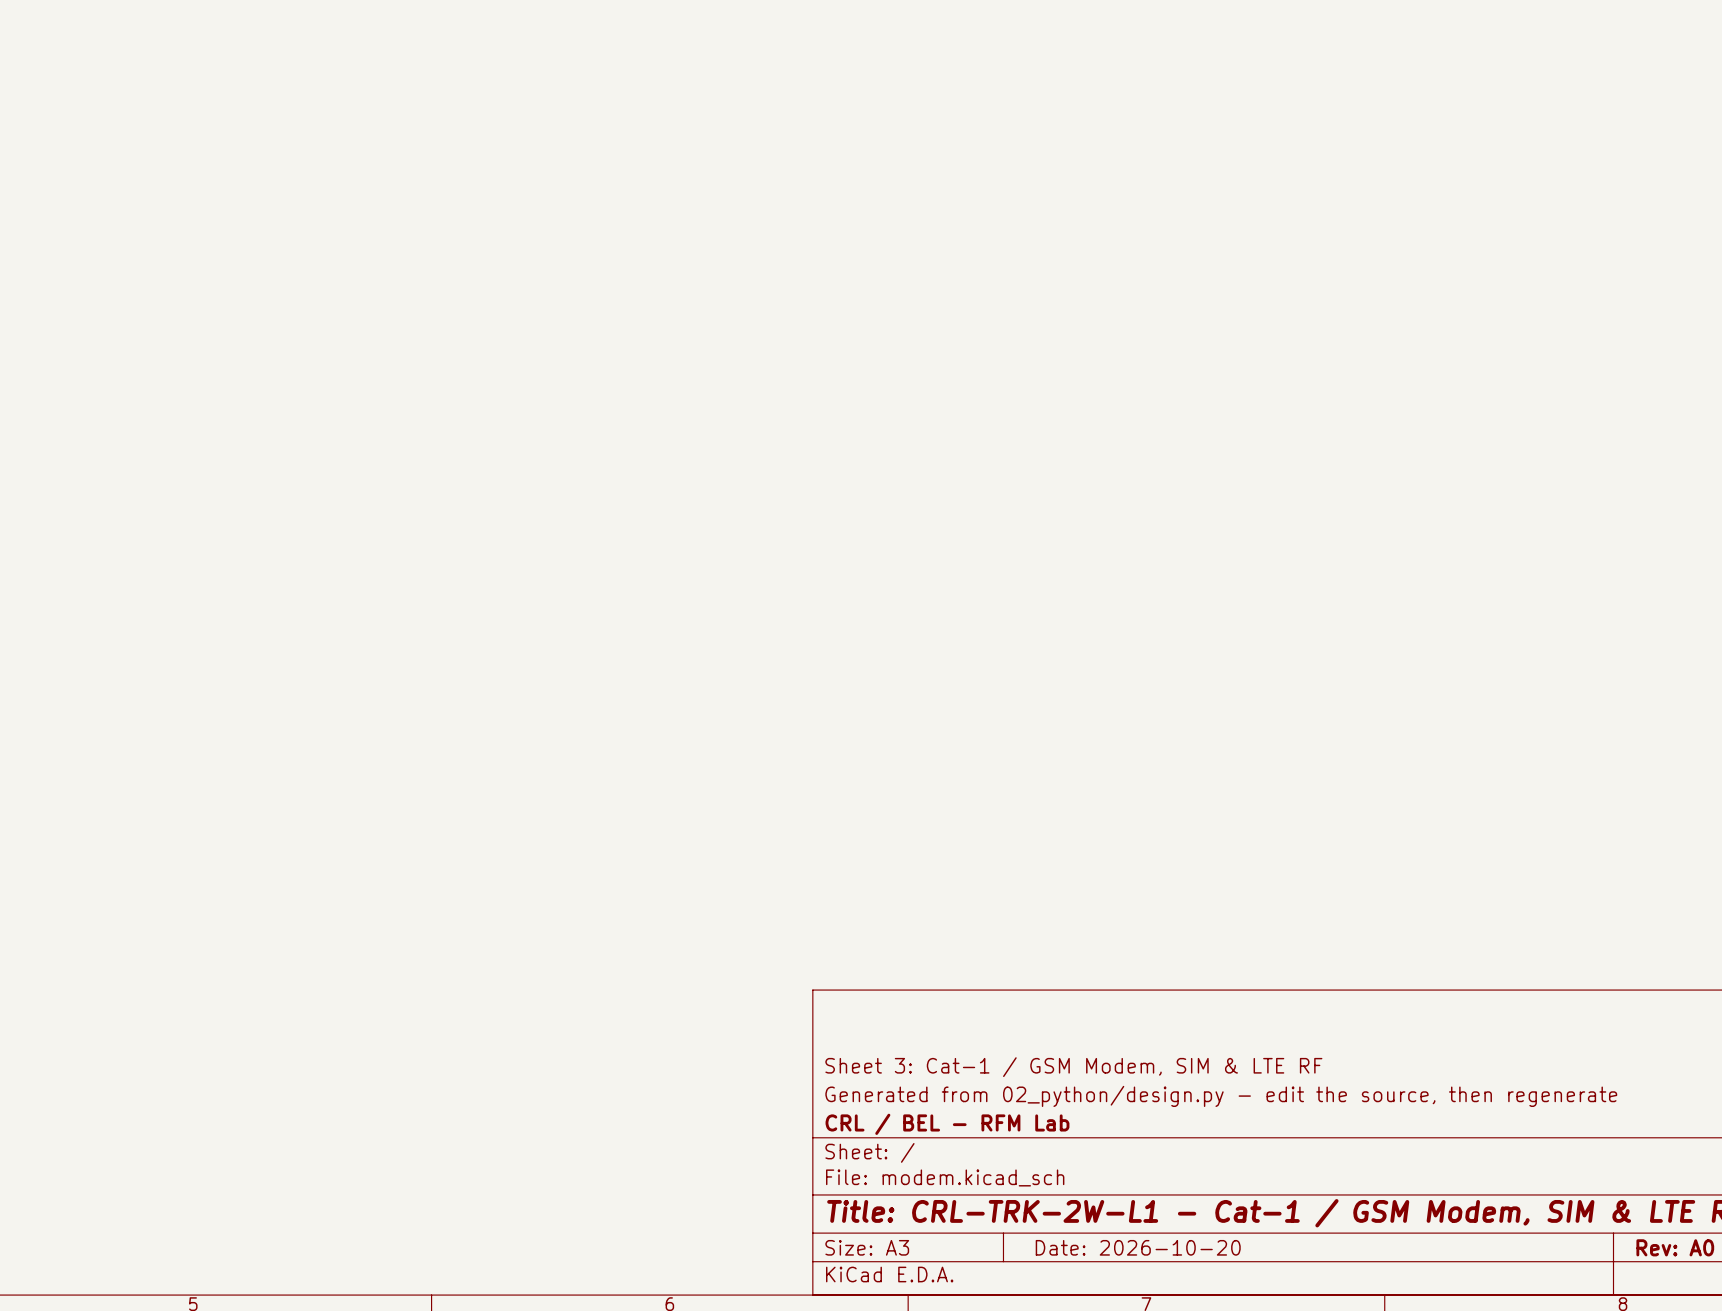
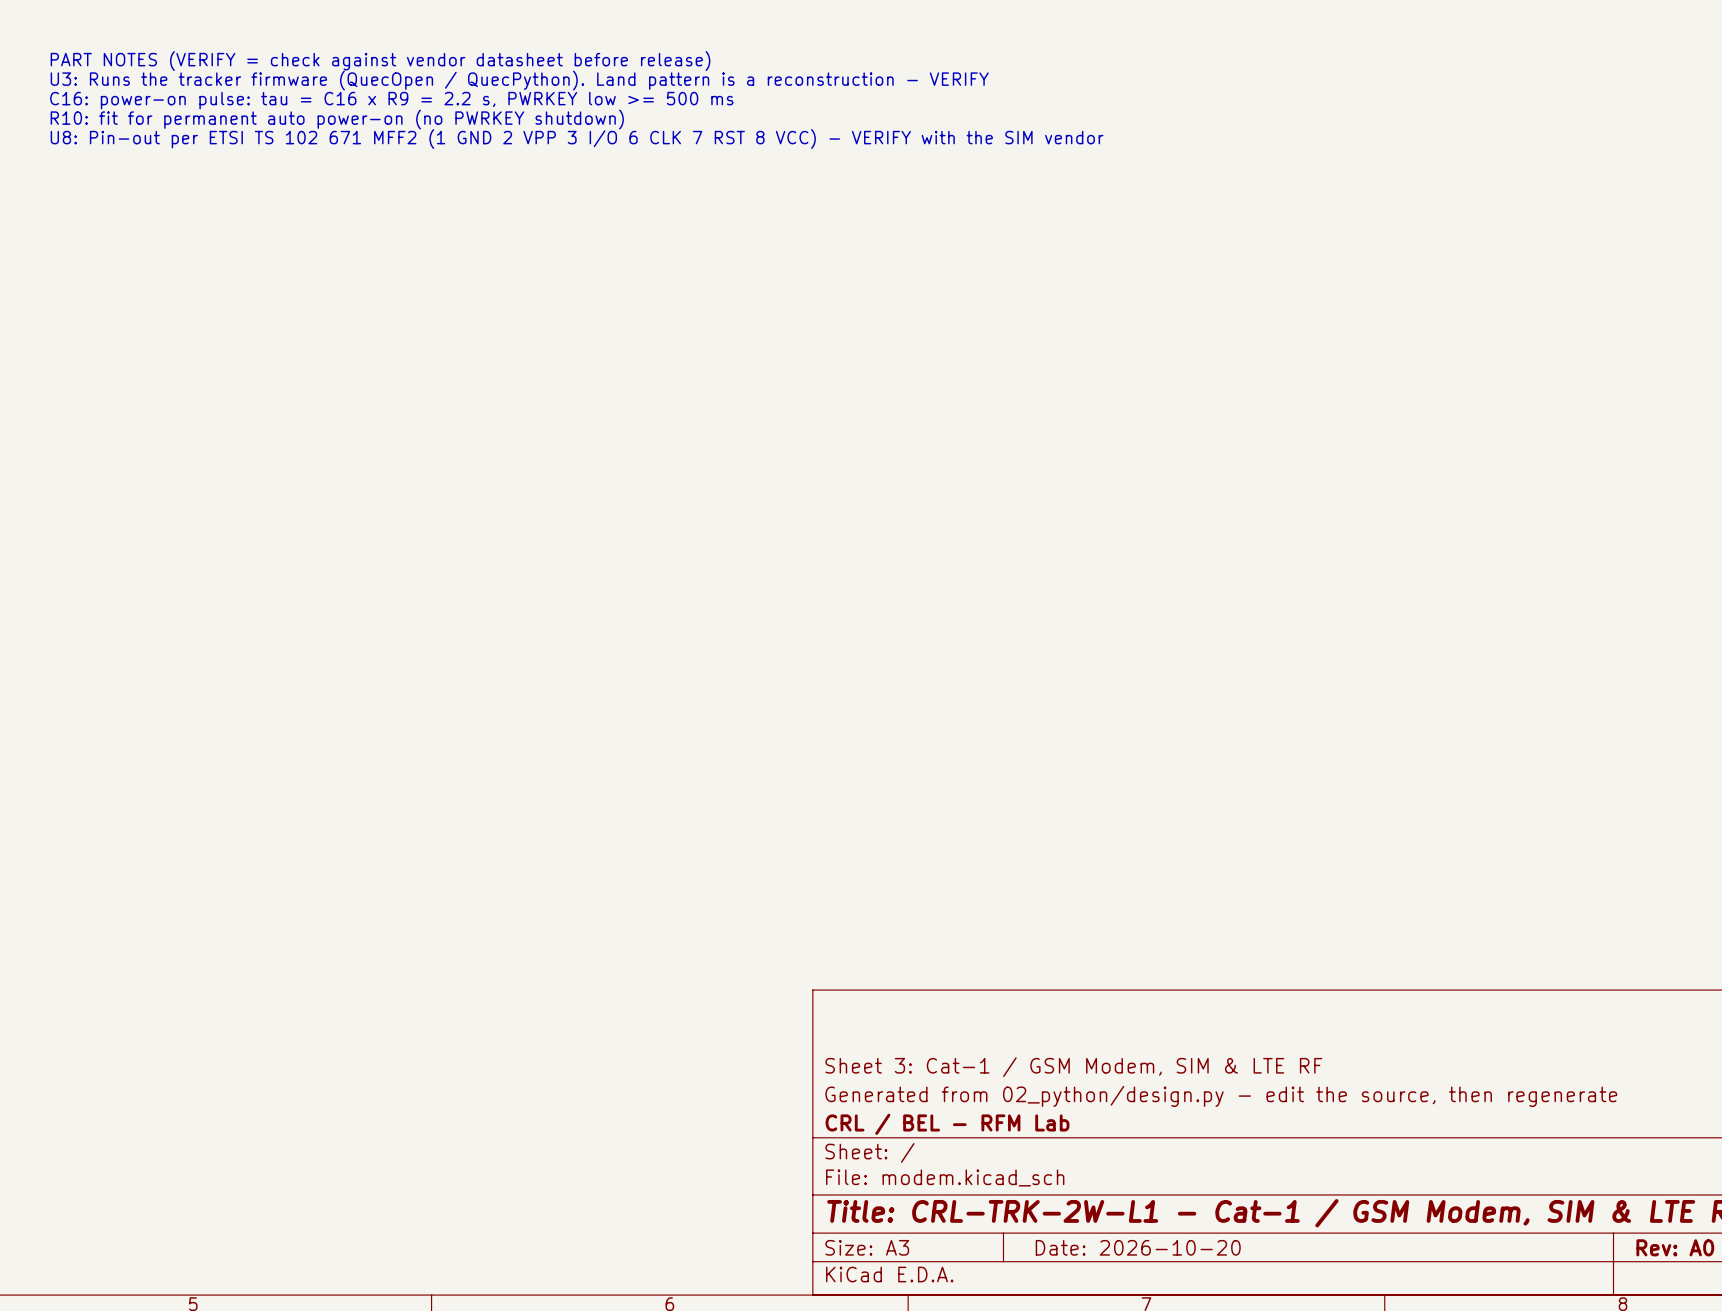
text: none -> PART NOTES (VERIFY = check against vendor datasheet before release) (380, 61)
text: none -> U3: Runs the tracker firmware (QuecOpen / QuecPython). Land pattern is a reconstruction - VERIFY (519, 80)
text: none -> C16: power-on pulse: tau = C16 x R9 = 2.2 s, PWRKEY low >= 500 ms (391, 100)
text: none -> R10: fit for permanent auto power-on (no PWRKEY shutdown) (337, 119)
text: none -> U8: Pin-out per ETSI TS 102 671 MFF2 (1 GND 2 VPP 3 I/O 6 CLK 7 RST 8 VCC) - VERIFY with the SIM vendor (577, 139)

